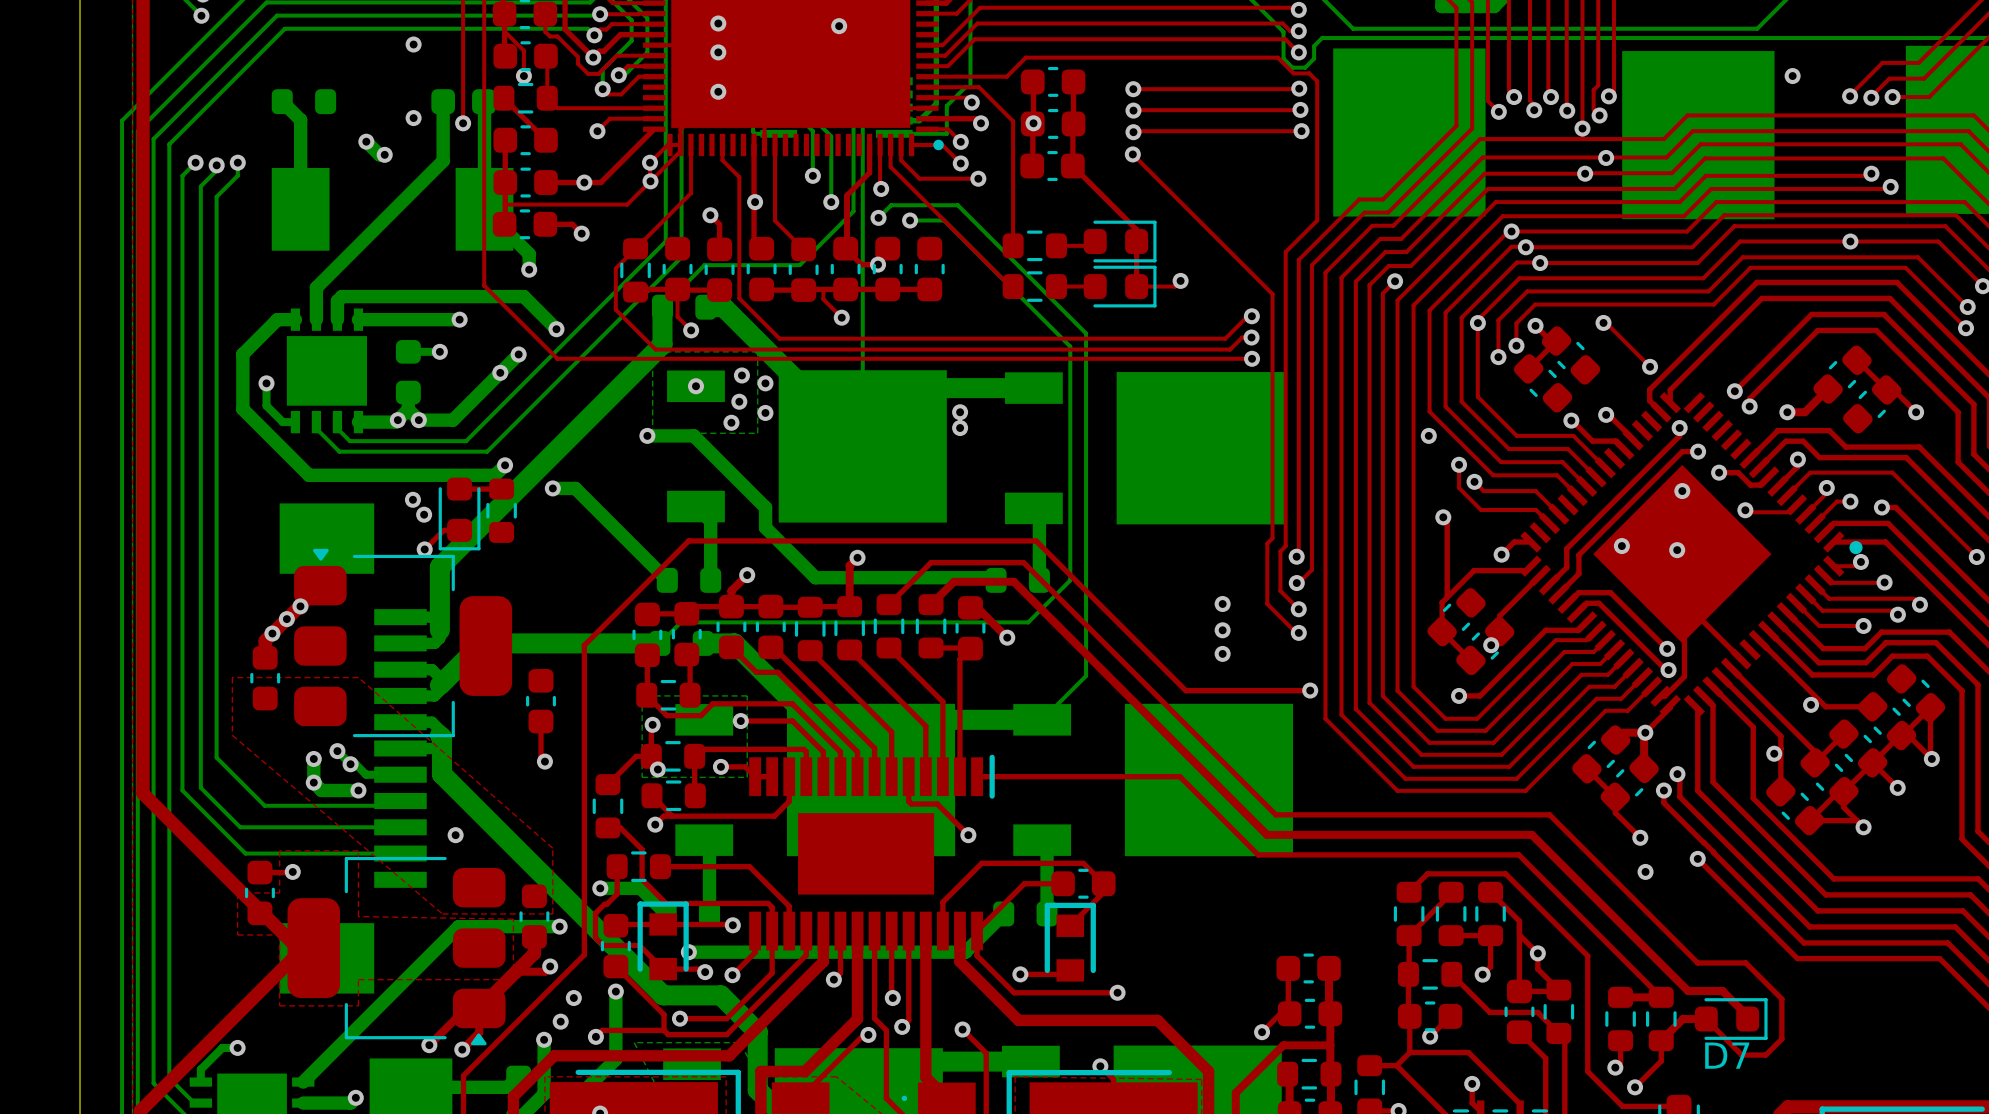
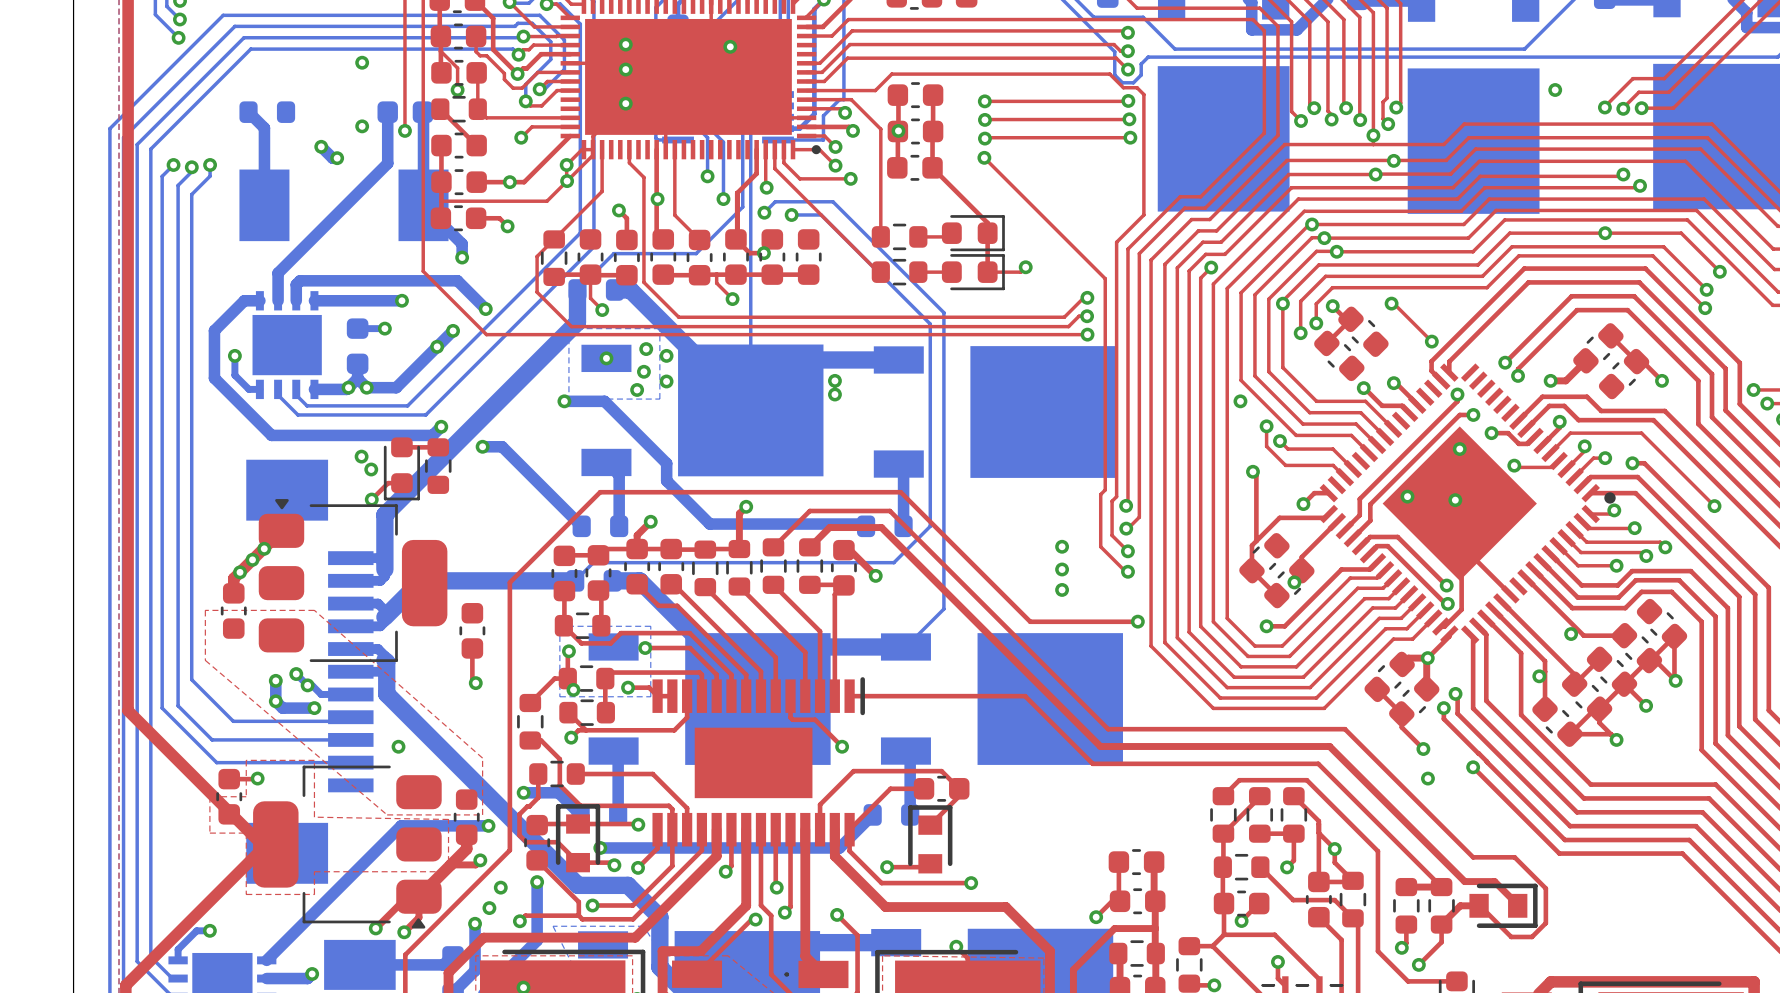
D7: (1731, 1019) -> none
part: none -> (1503, 905)

